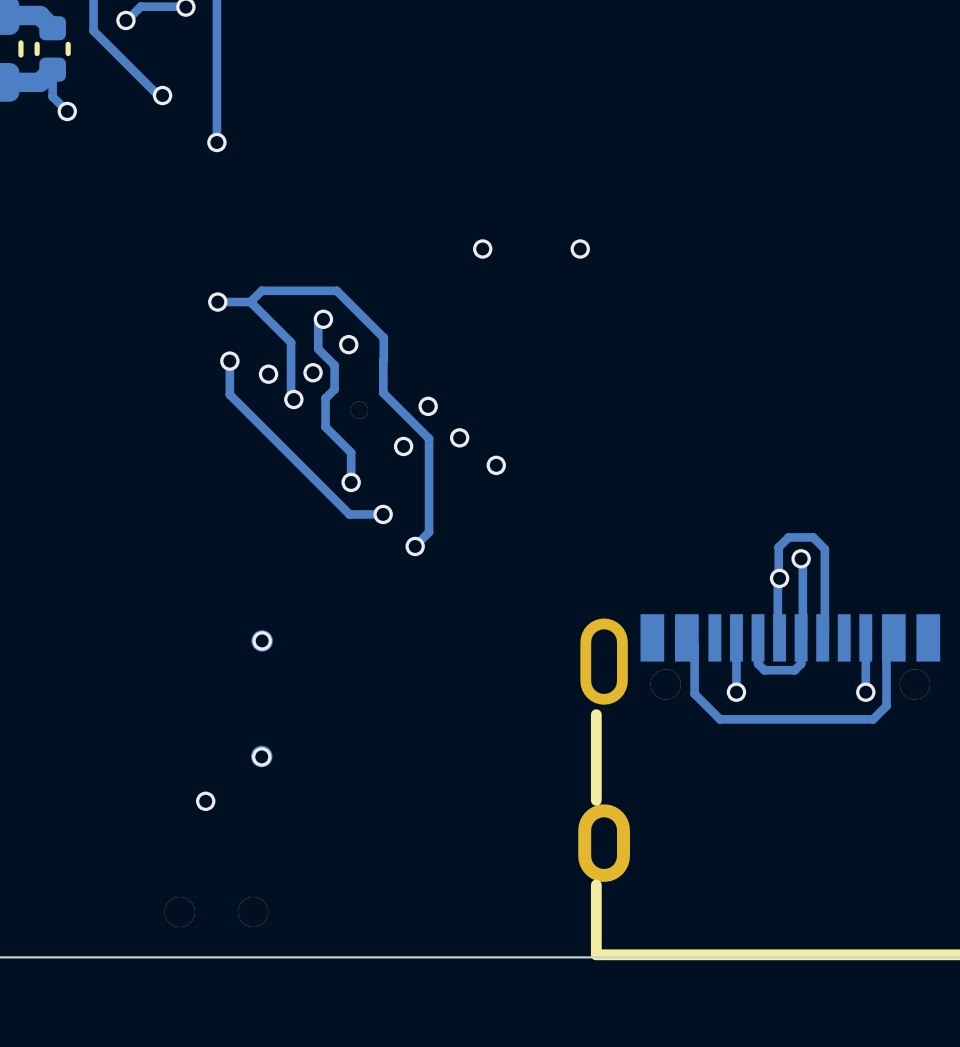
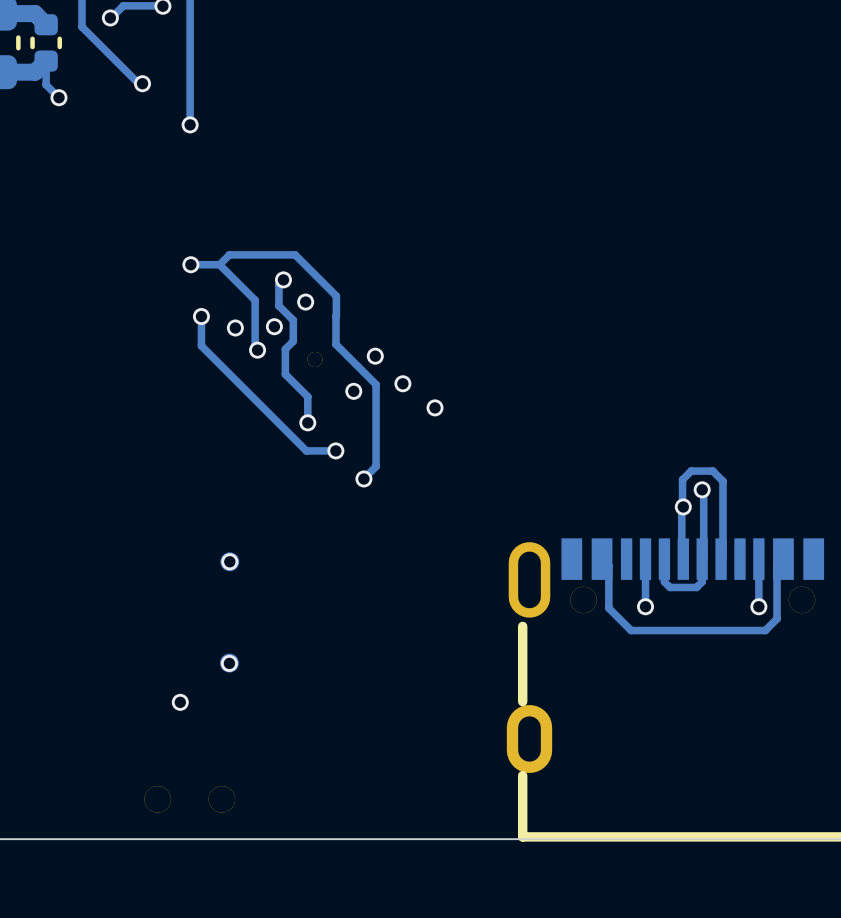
via: (482, 249) -> none
via: (580, 249) -> none

